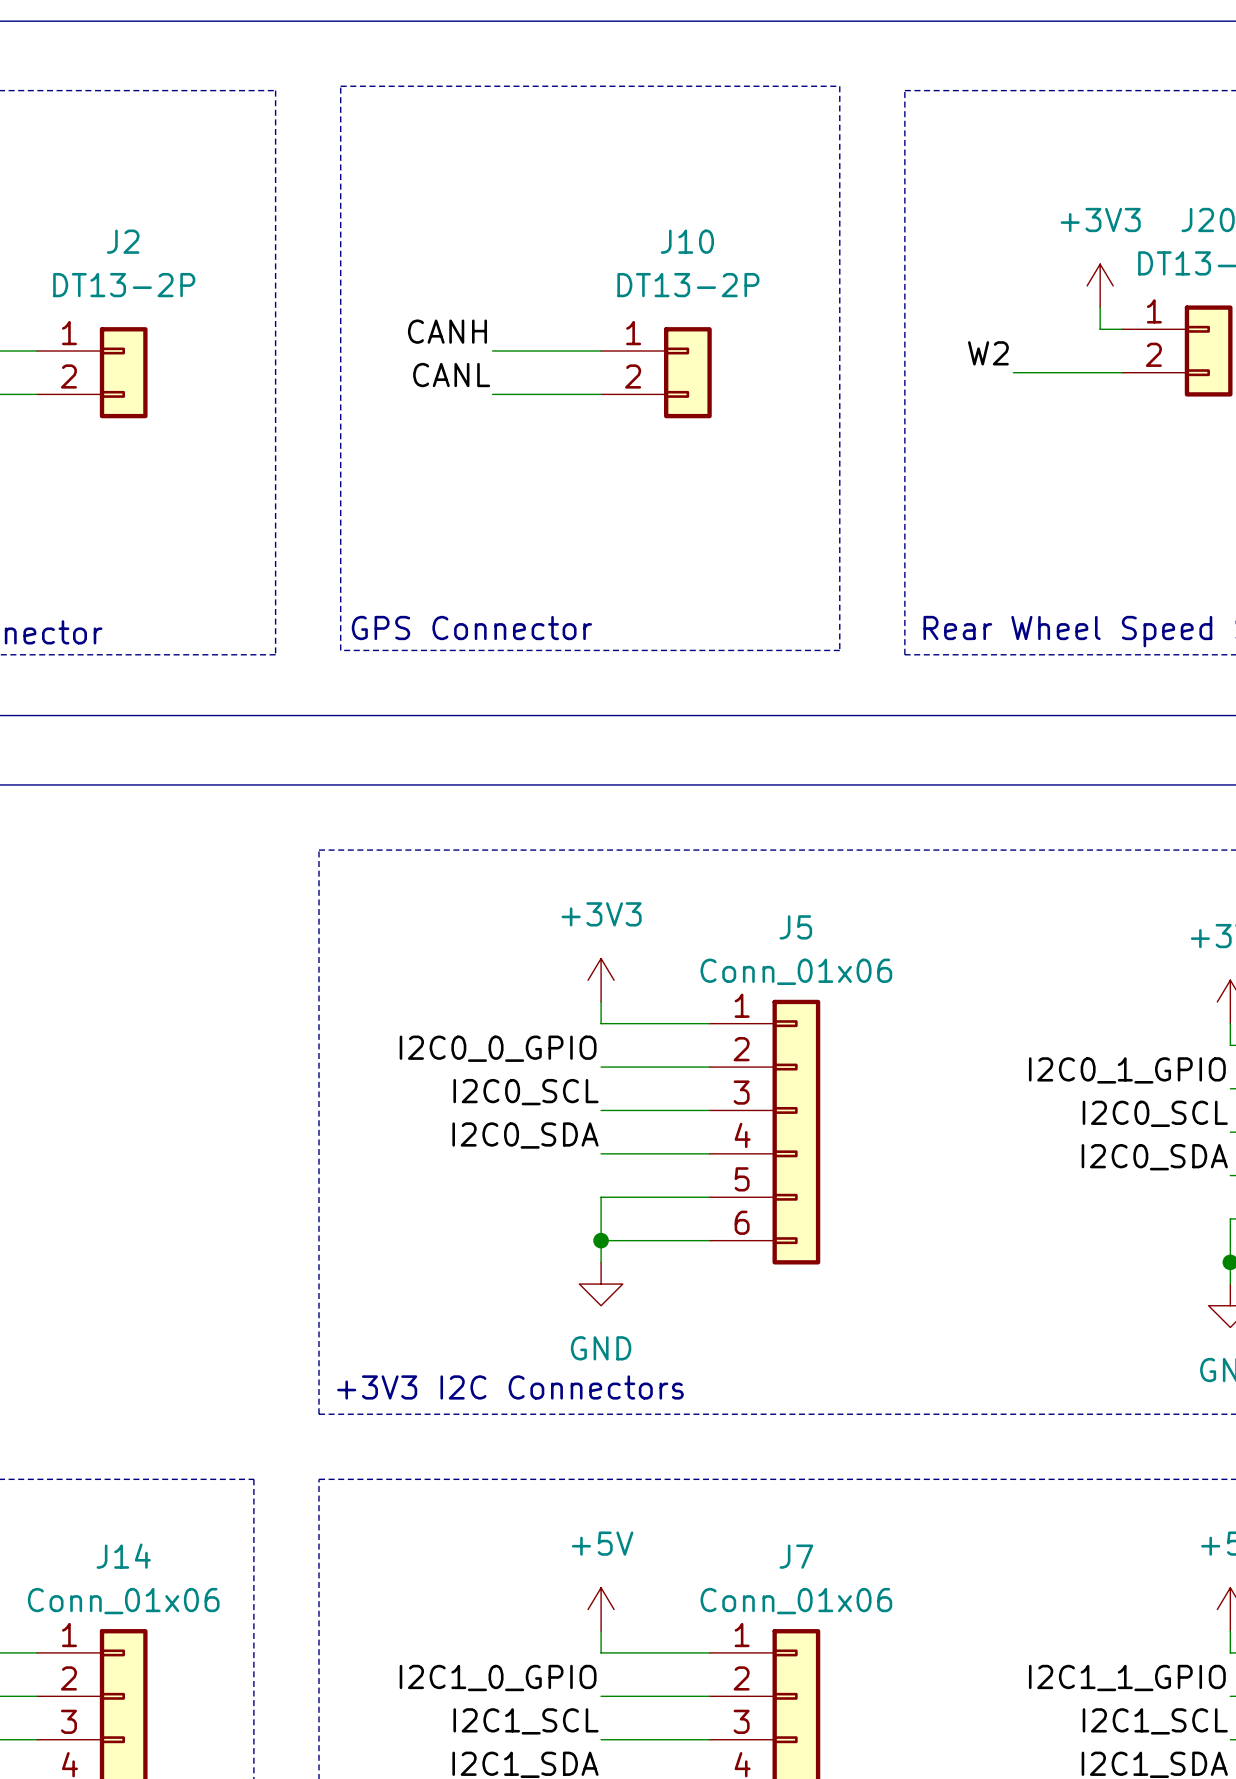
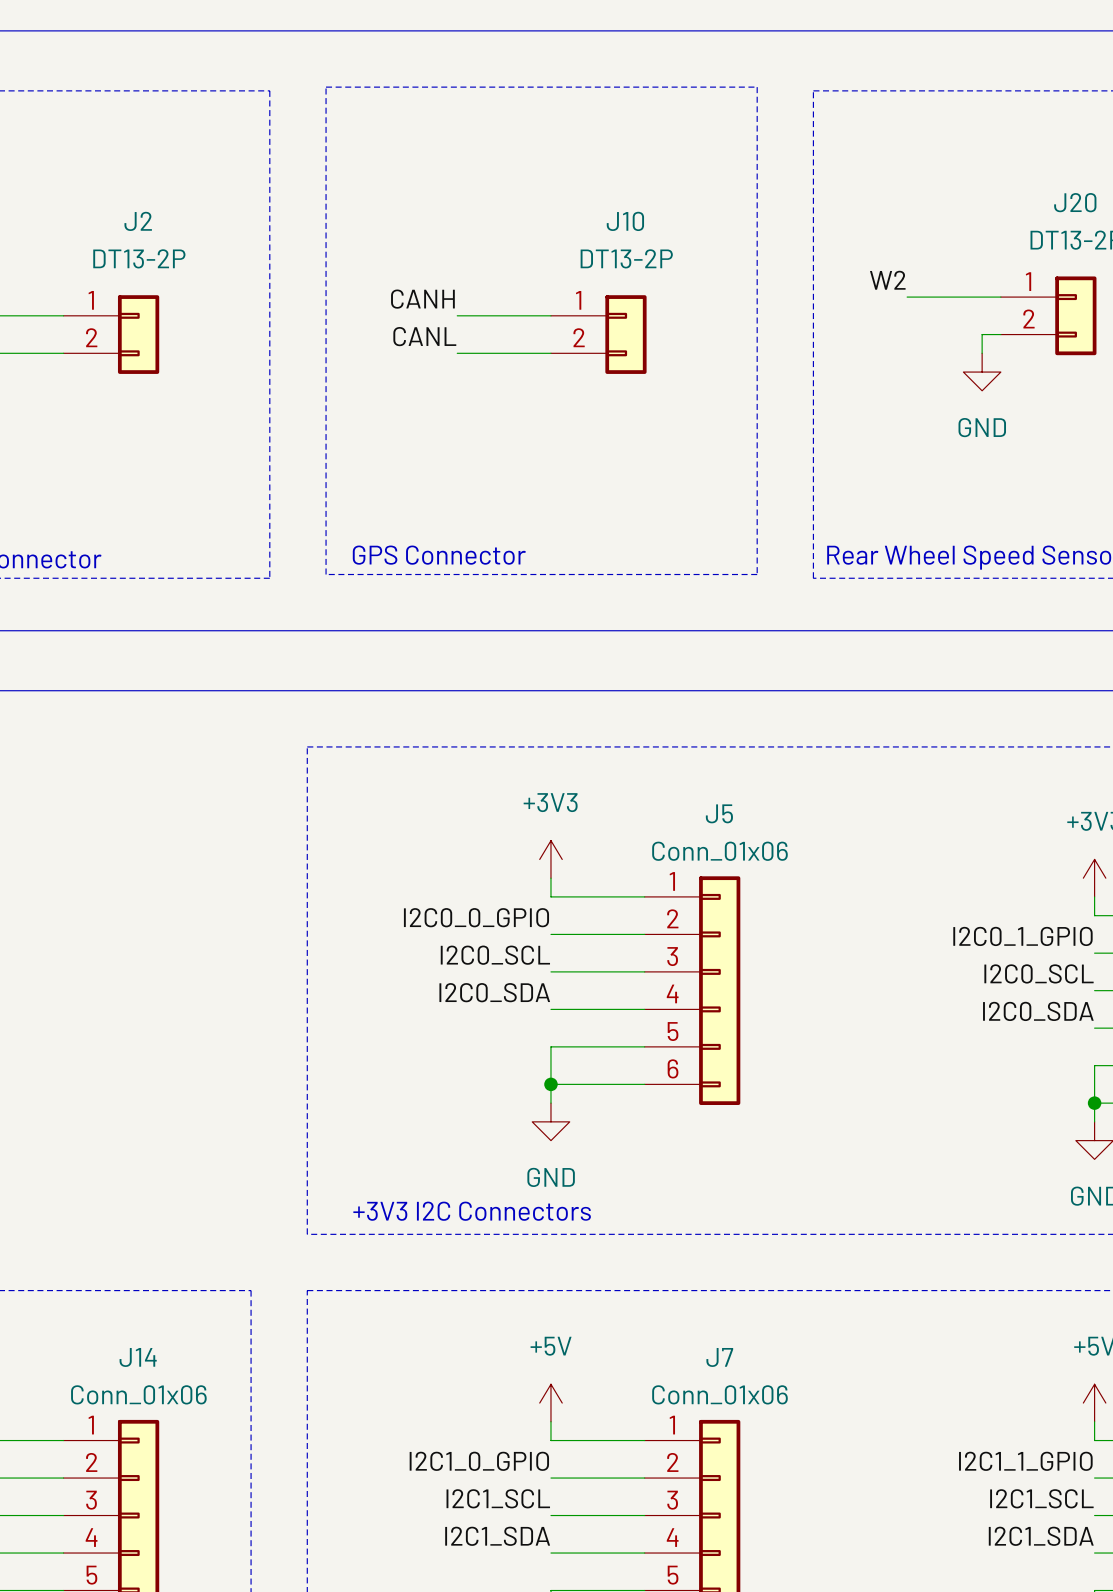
power symbol: +3V3 (1100, 285) -> none
wire: (1100, 307) (1100, 329) -> (907, 297) (982, 297)
label position: W2 (988, 353) -> W2 (887, 280)
wire: (1013, 372) (1100, 372) -> (982, 353) (982, 334)
power symbol: none -> GND (982, 372)

